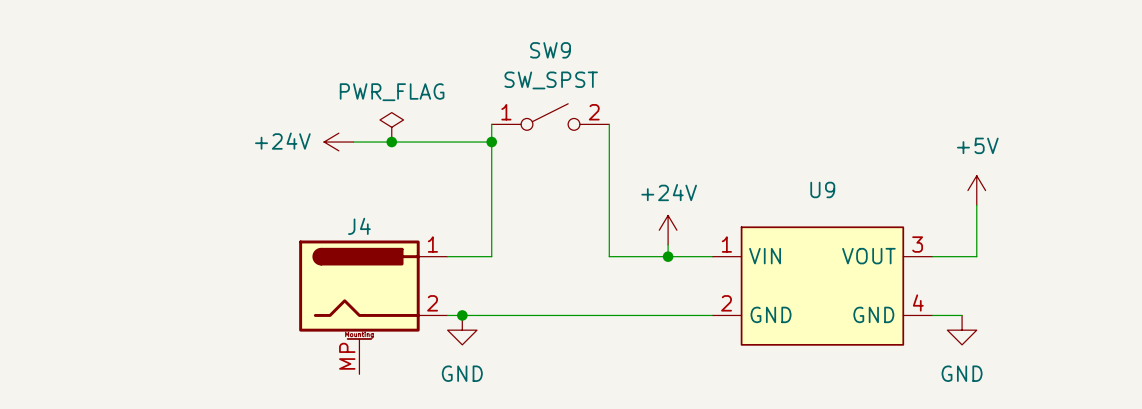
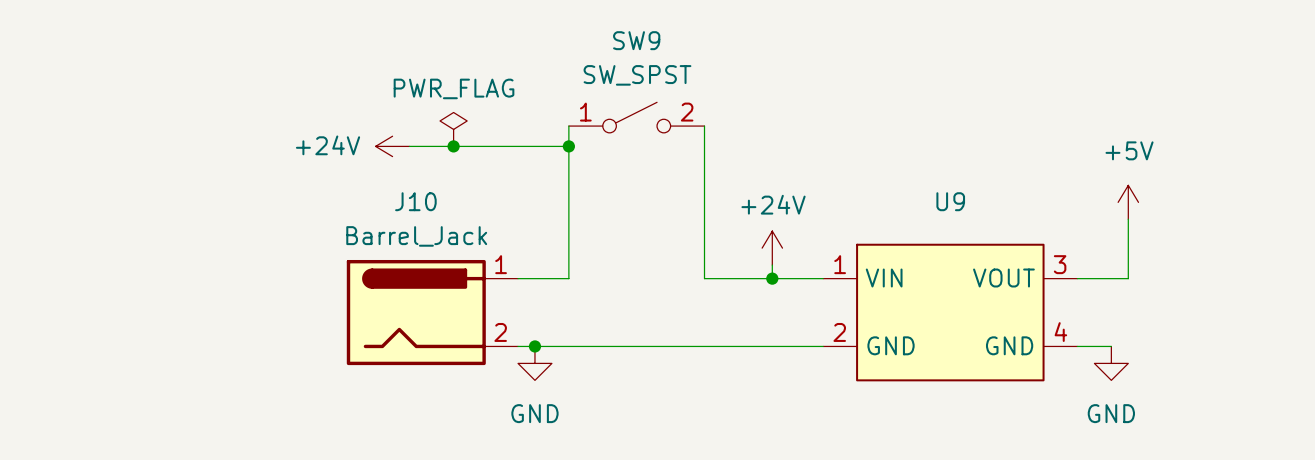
J10: none -> Barrel_Jack (432, 312)
J4: (373, 307) -> none

